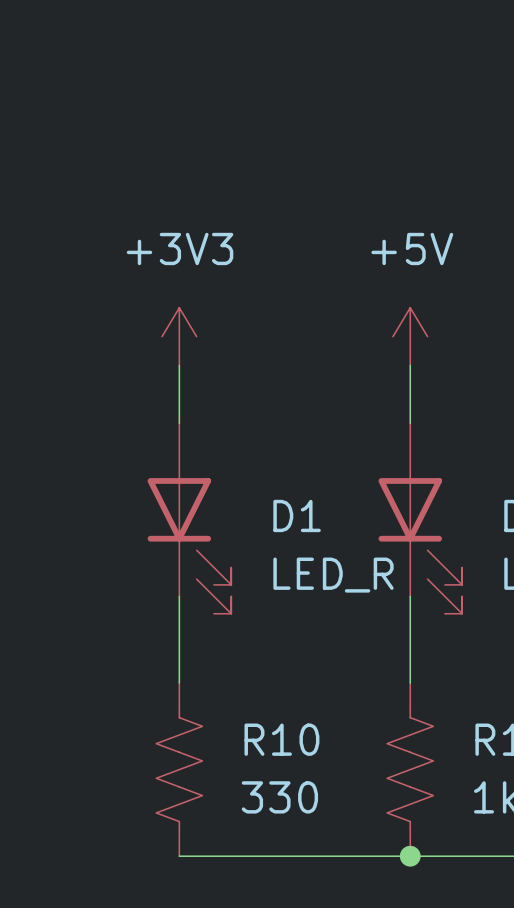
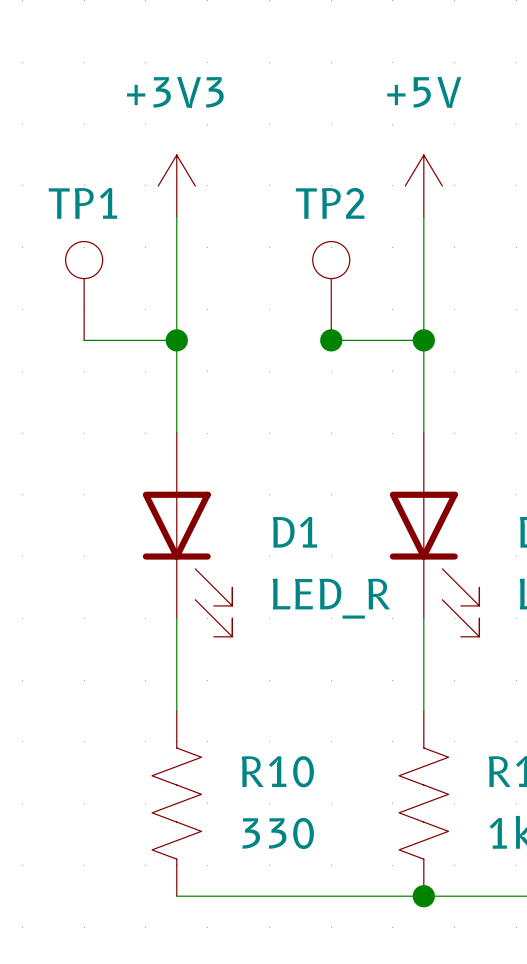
wire: none -> (176, 216) (176, 371)
wire: none -> (423, 216) (423, 371)
TP1: none -> (84, 290)
TP2: none -> (331, 290)
wire: none -> (84, 340) (176, 340)
power symbol position: +3V3 (179, 336) -> +3V3 (176, 185)
junction: none -> (176, 340)
wire: none -> (331, 340) (423, 340)
junction: none -> (331, 340)
power symbol position: +5V (410, 336) -> +5V (423, 185)
junction: none -> (423, 340)

